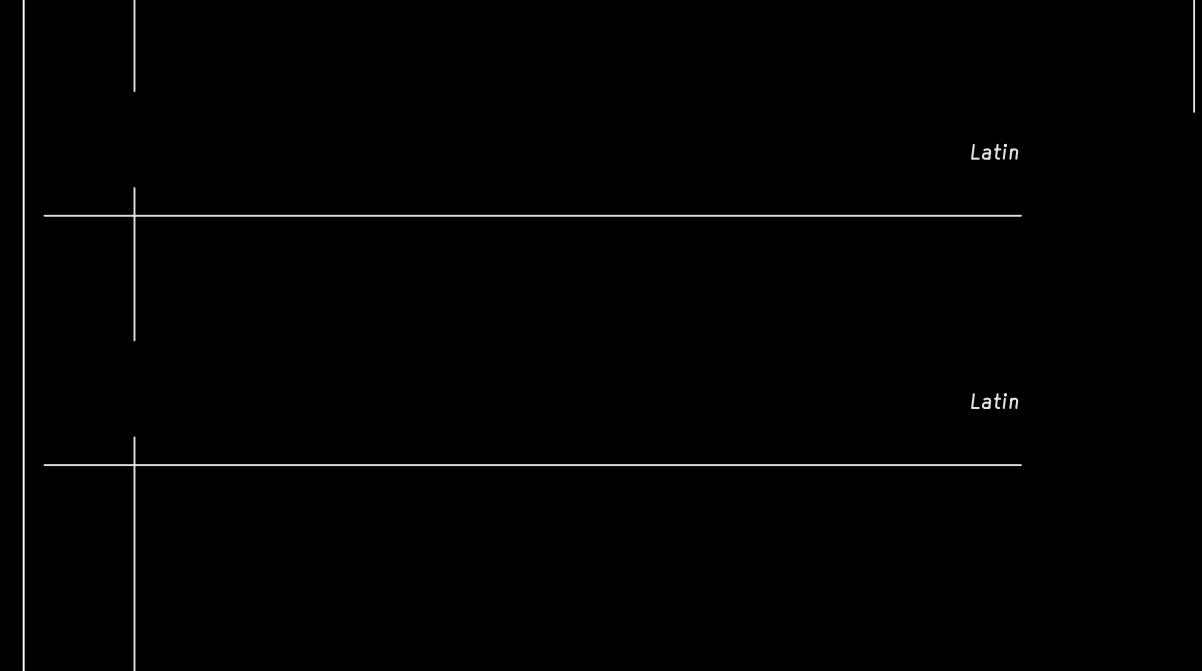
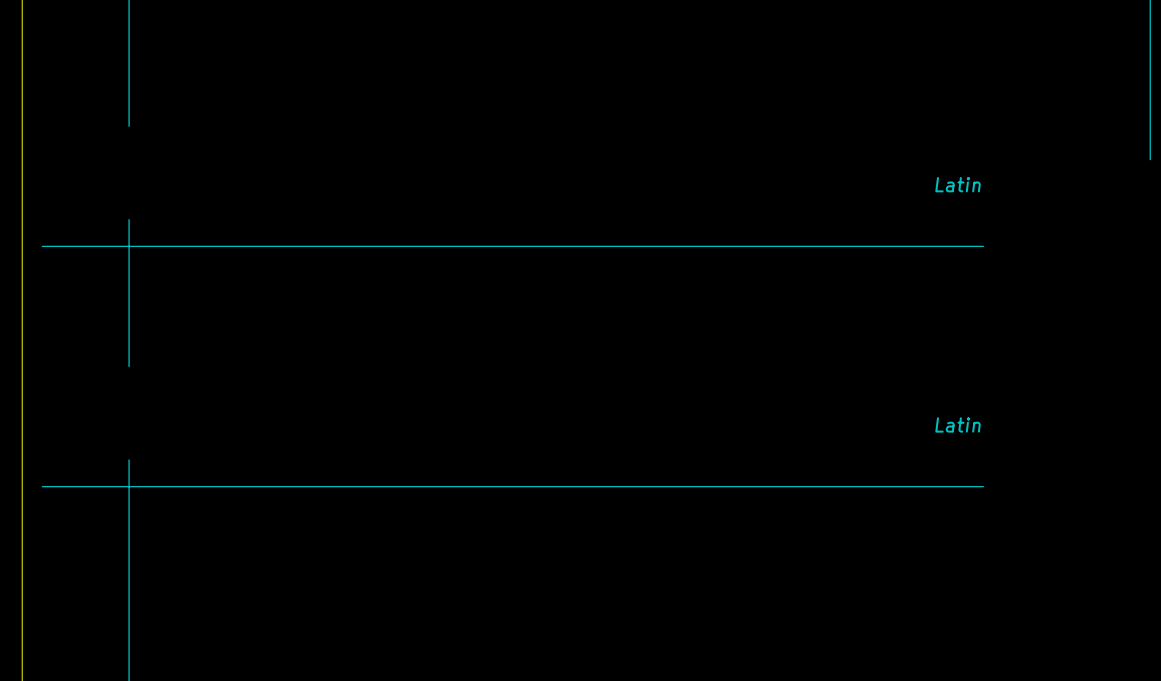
line: none -> (1150, 146) (1150, 159)

